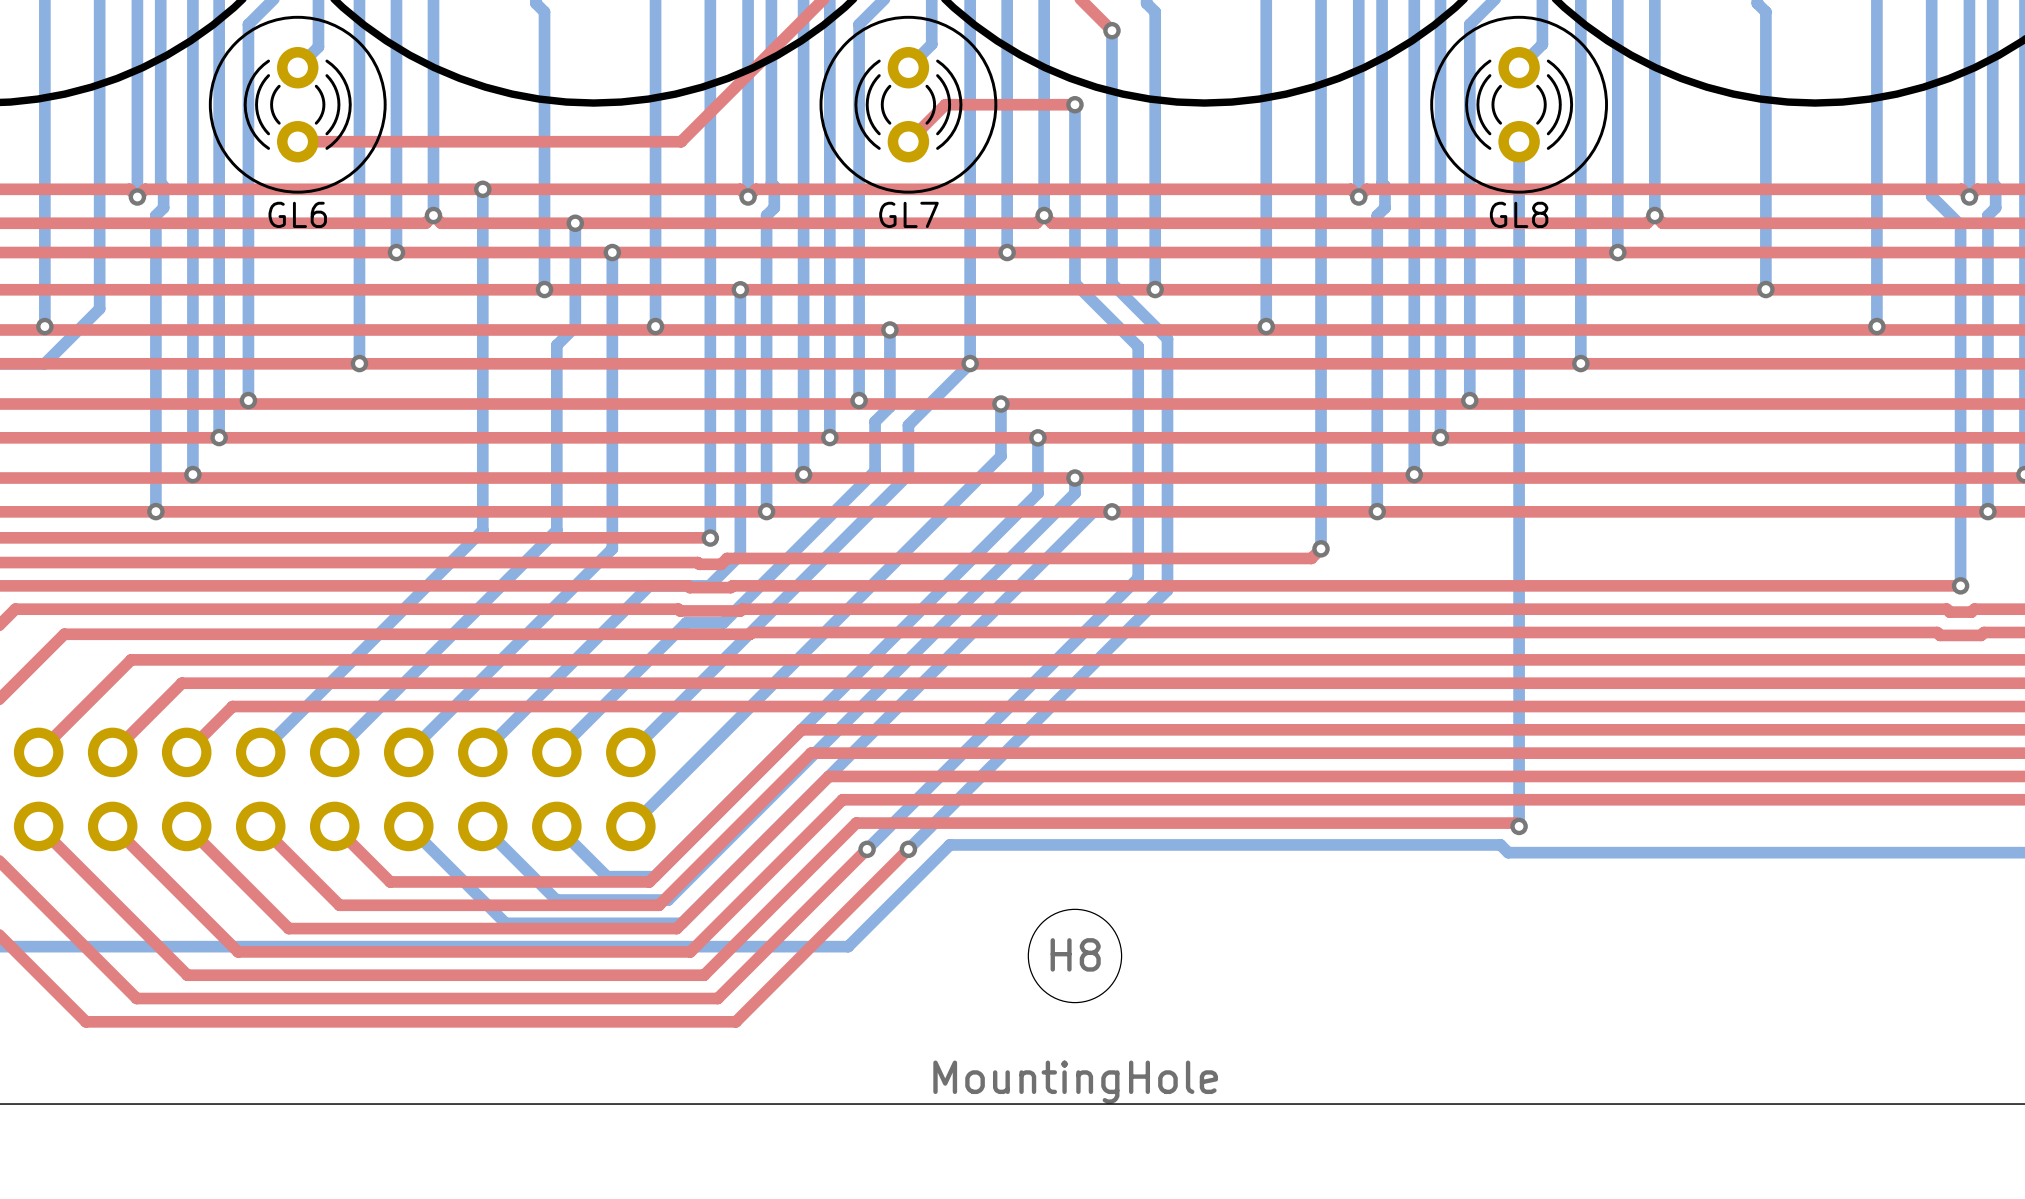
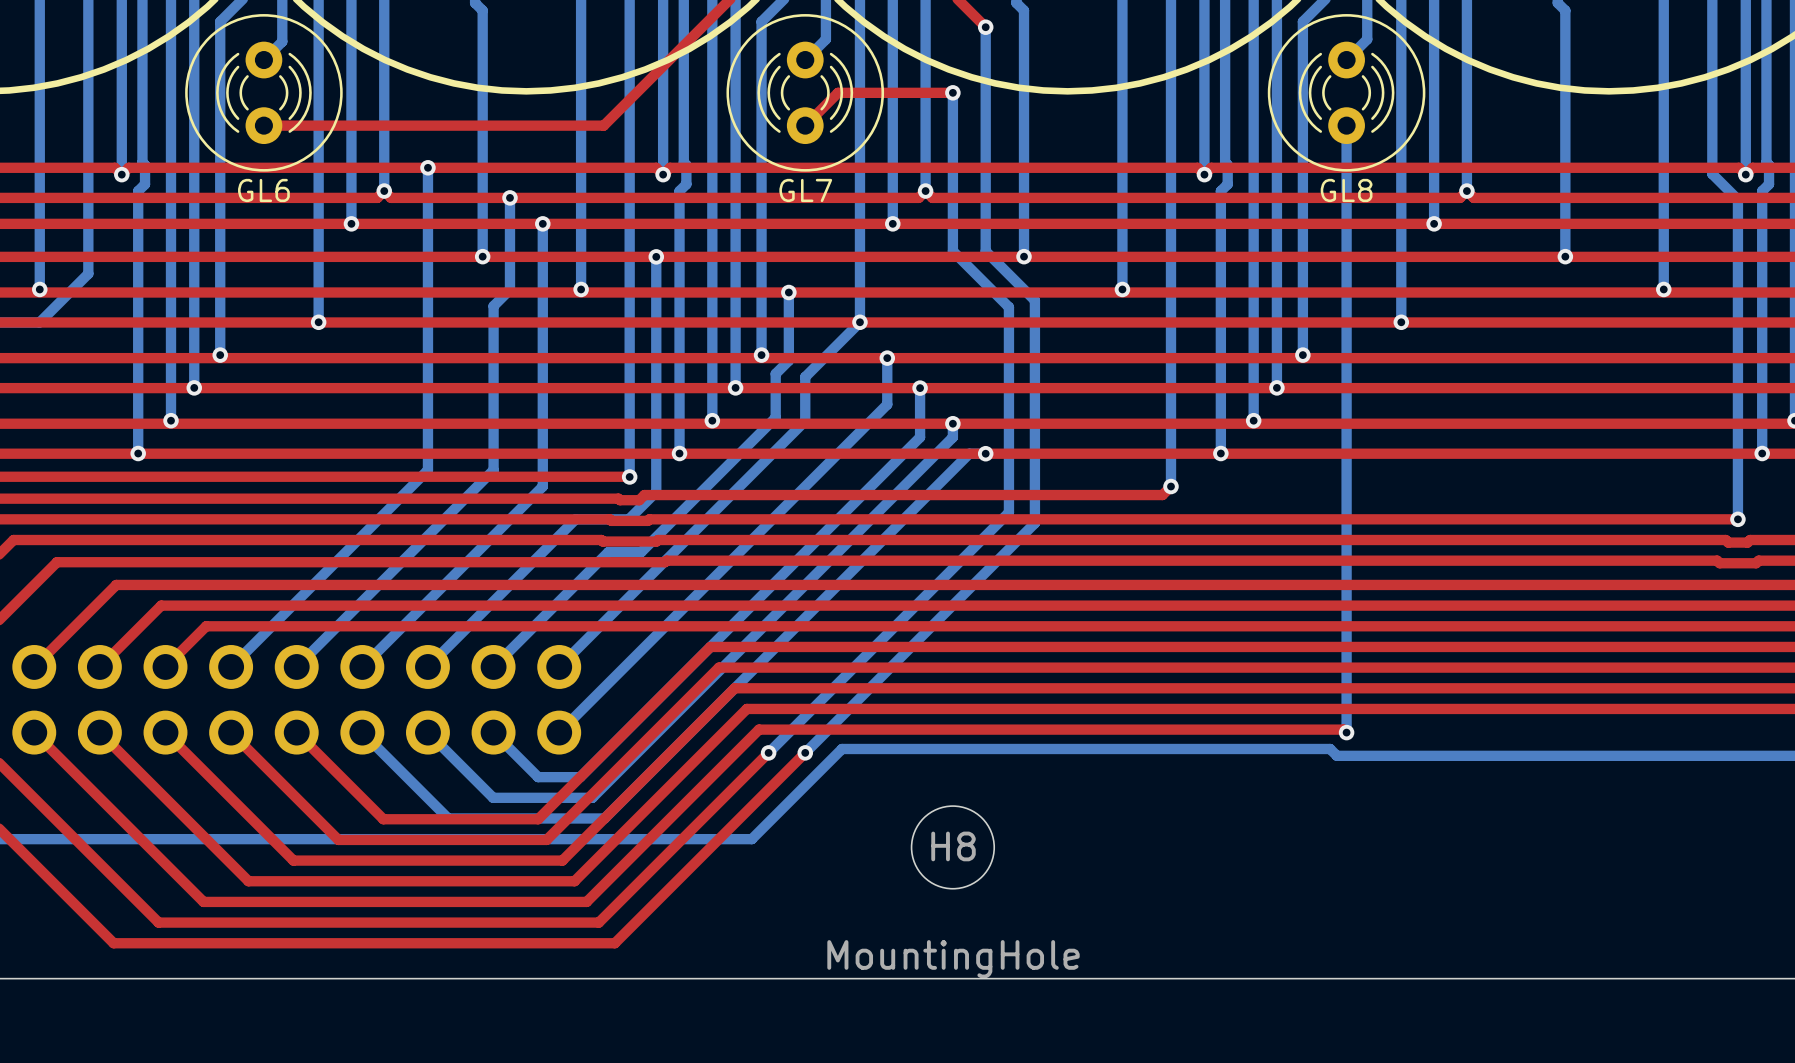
top track: (390, 881) (649, 881) -> (345, 781) (383, 819) (538, 819) (575, 781)
top track: (339, 905) (659, 905) -> (300, 802) (338, 839) (546, 839) (584, 802)
top track: (288, 928) (676, 928) -> (256, 823) (293, 860) (562, 860) (599, 823)
top track: (238, 951) (690, 951) -> (211, 843) (248, 881) (574, 881) (612, 843)
top track: (187, 975) (704, 975) -> (166, 864) (203, 901) (586, 901) (624, 864)
top track: (136, 998) (717, 998) -> (121, 885) (158, 922) (598, 922) (636, 885)
top track: (86, 1021) (735, 1021) -> (76, 905) (113, 943) (614, 943) (652, 905)

